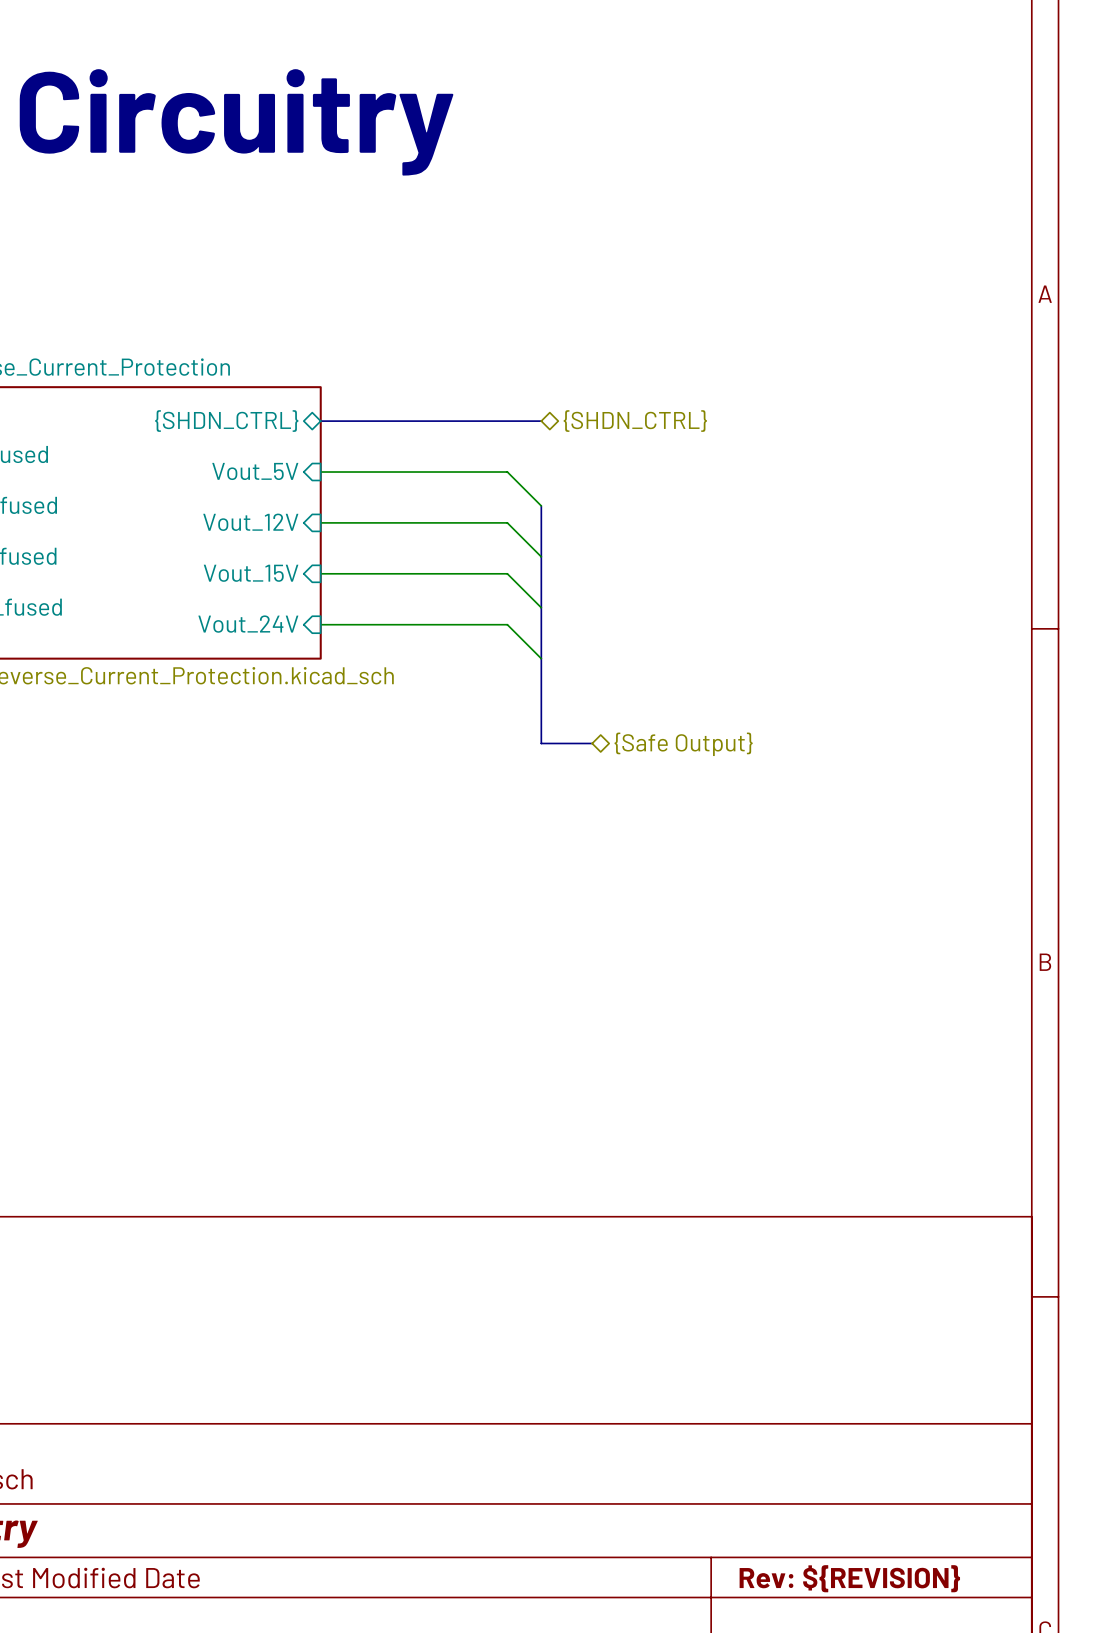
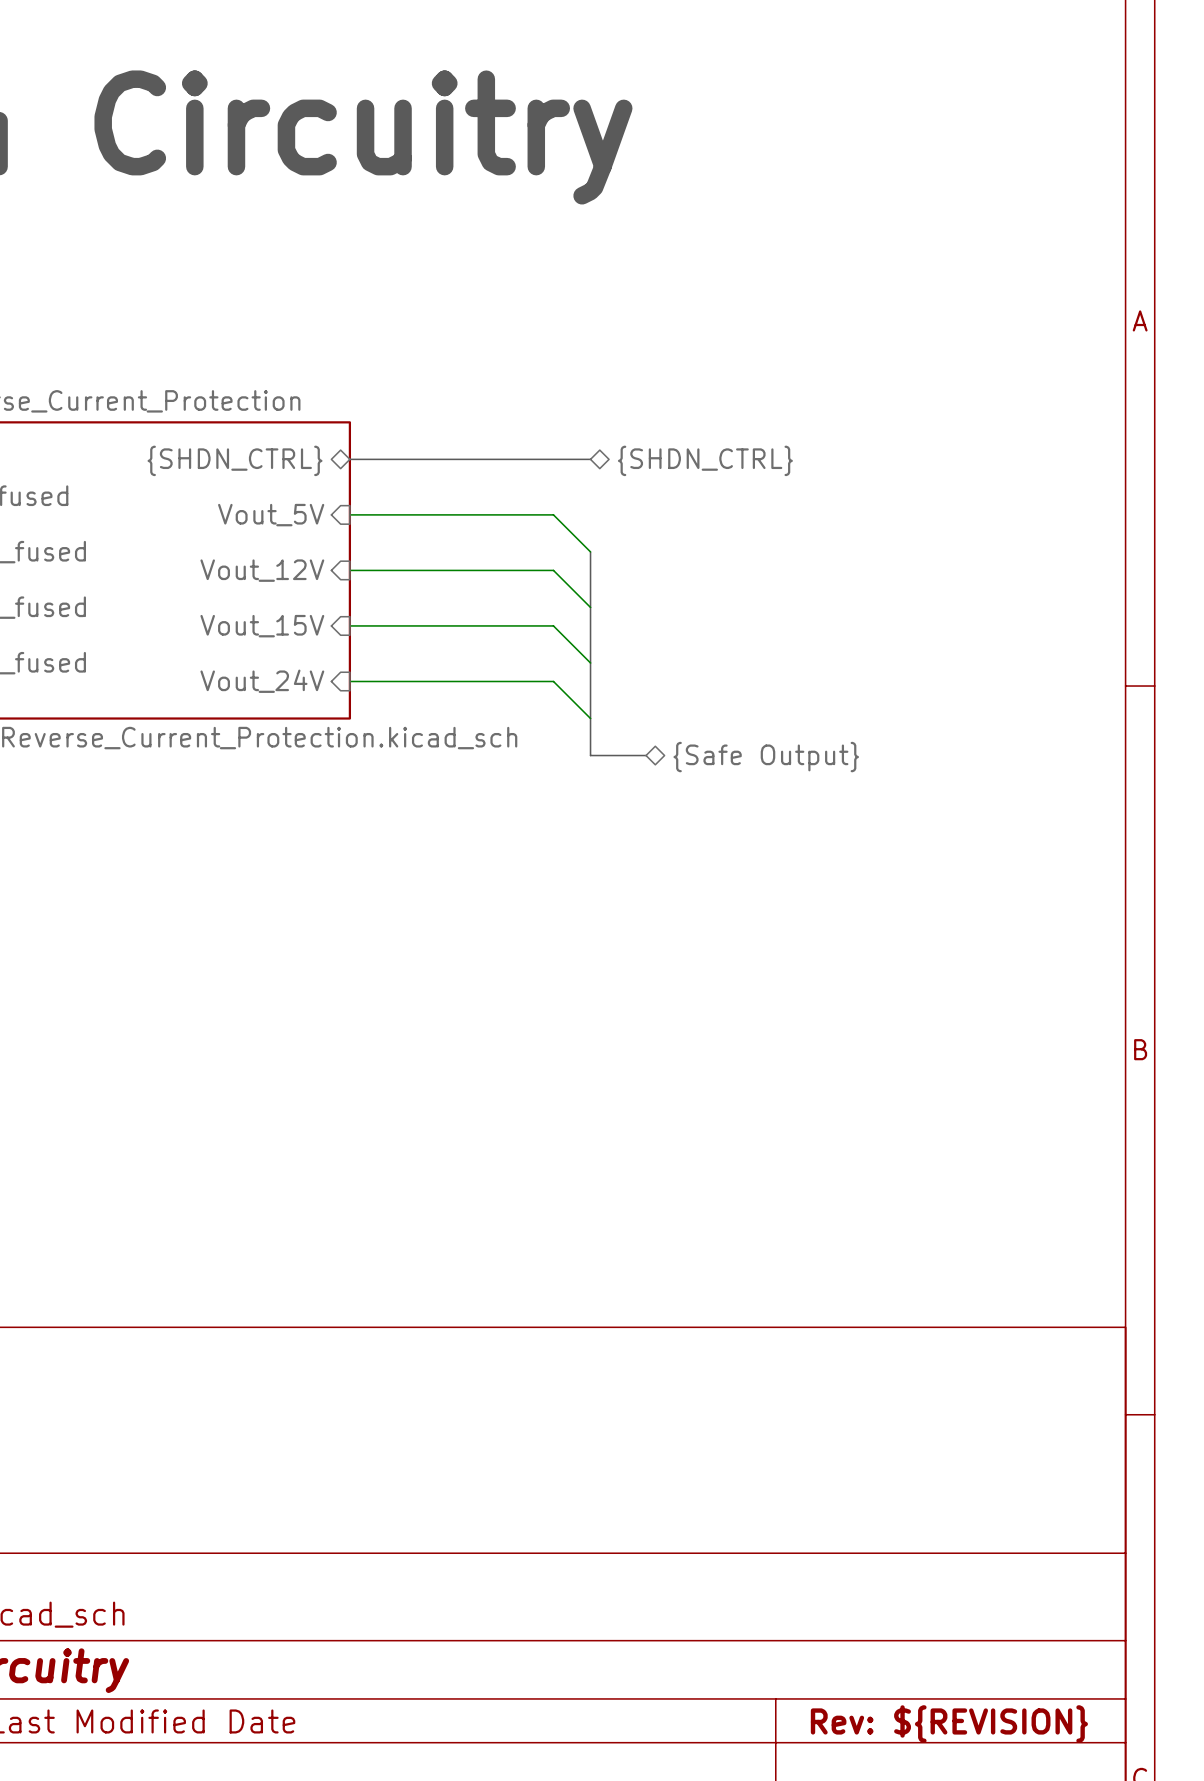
bus: (541, 692) (541, 743) (592, 743) -> (590, 755) (646, 755)
hierarchical label position: {Safe Output} (683, 744) -> {Safe Output} (766, 757)

